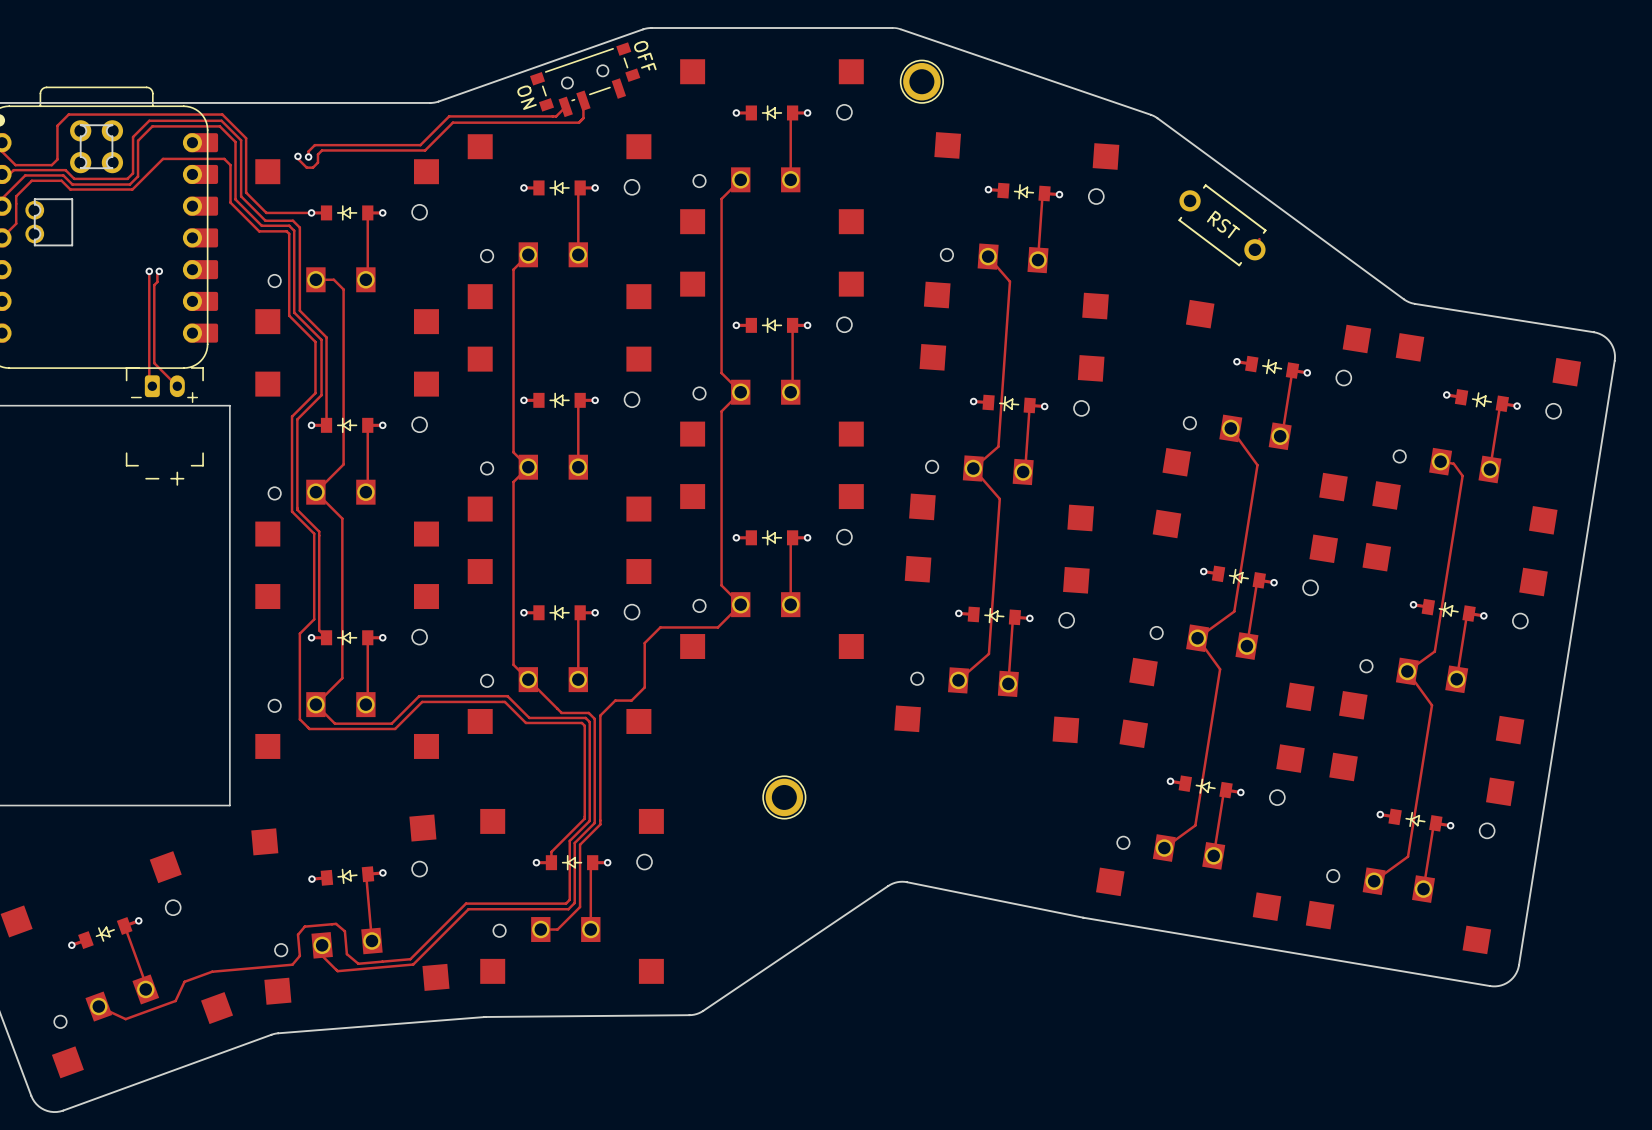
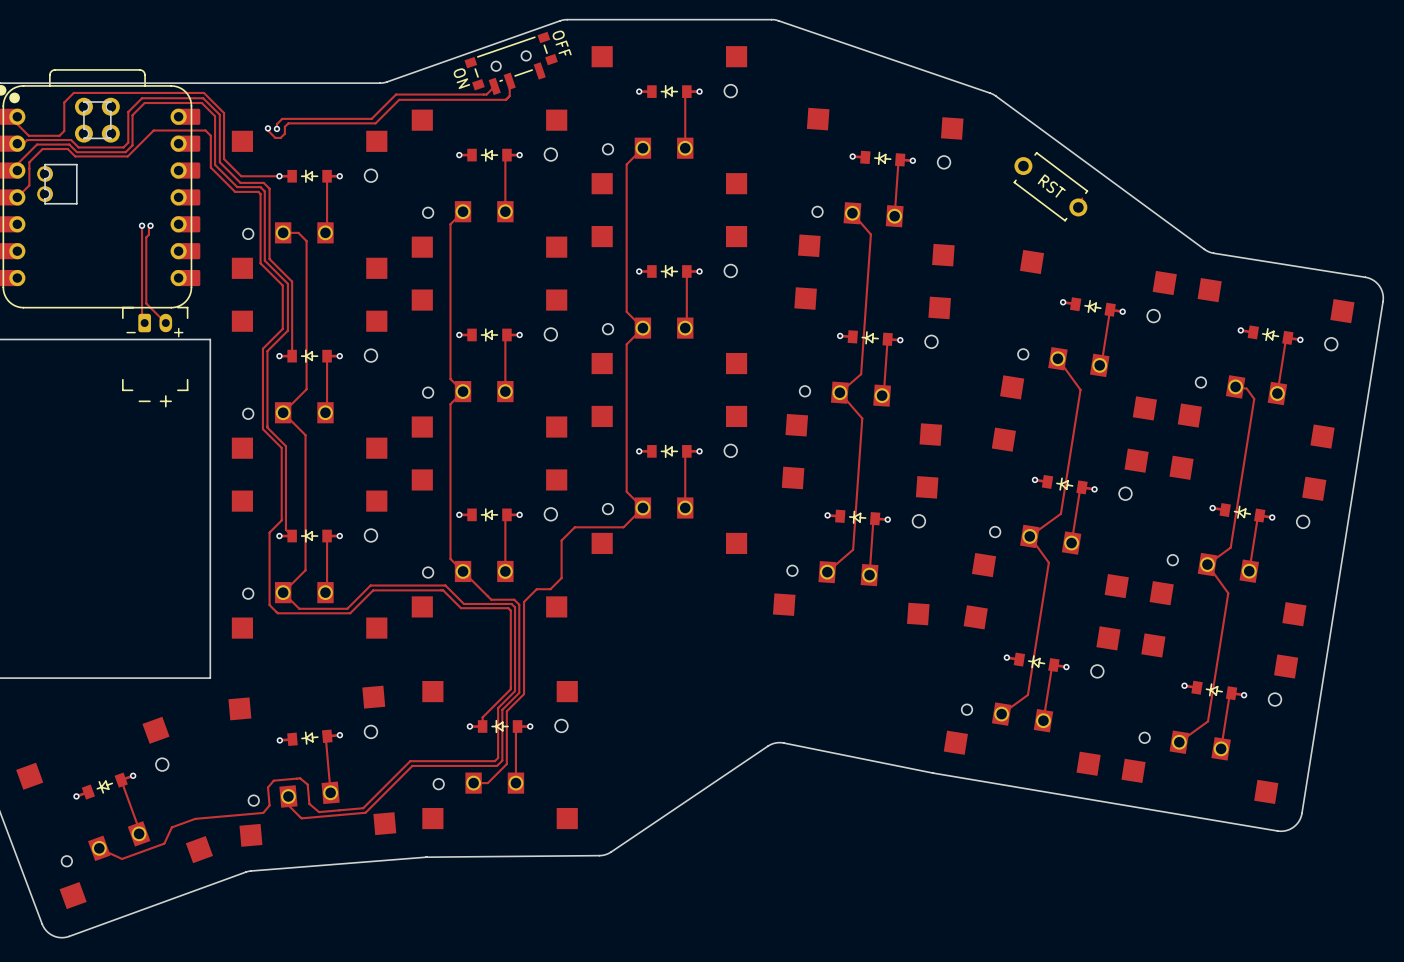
part: (921, 81) -> none
part: (784, 797) -> none

